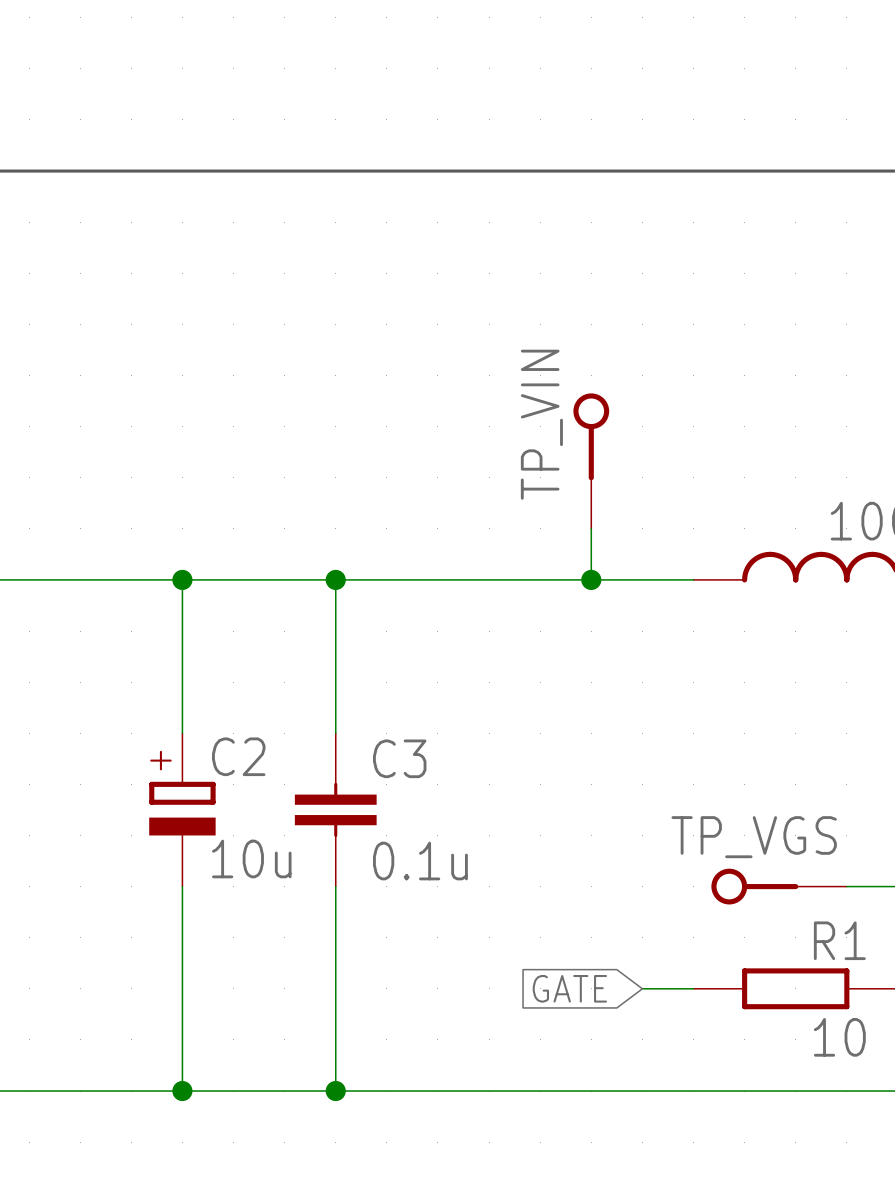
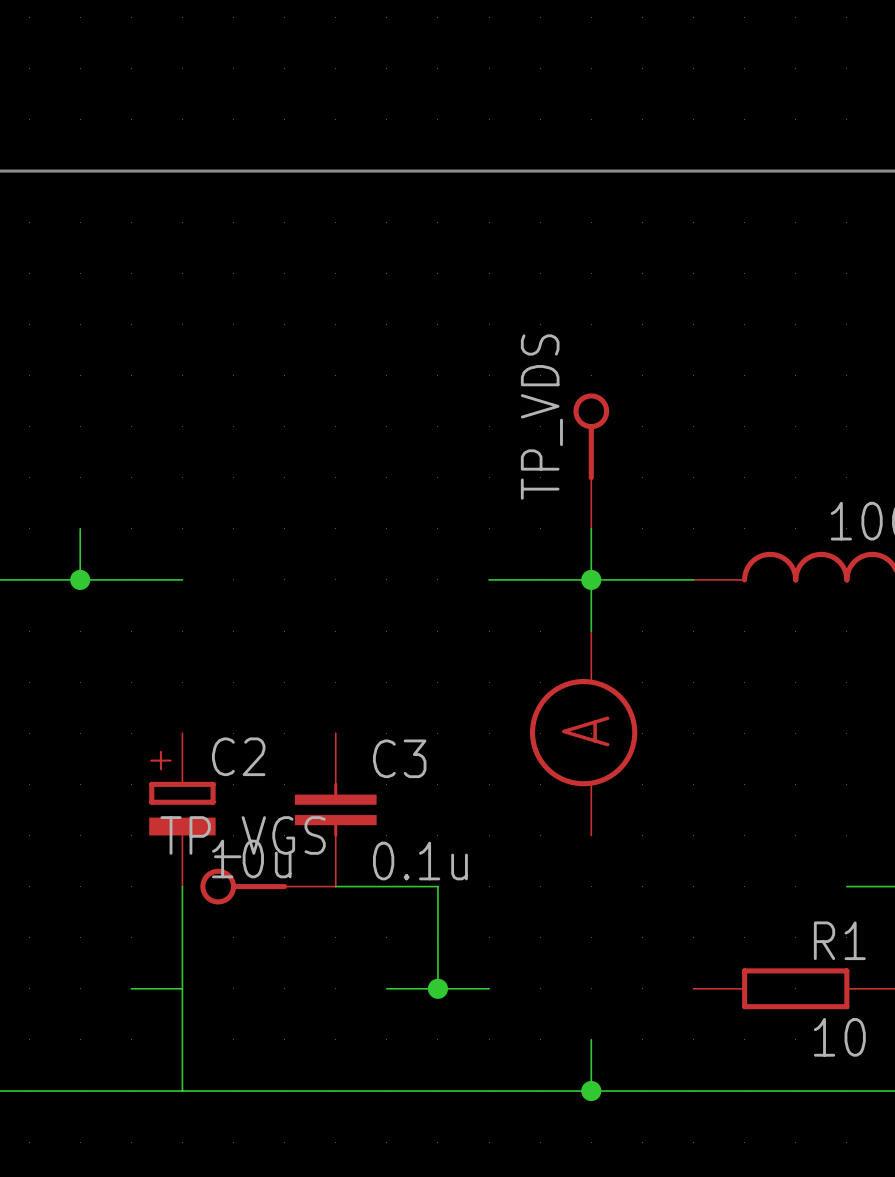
TP_VIN name: TP_VIN (541, 424) -> TP_VDS (541, 417)
wire: none -> (80, 528) (80, 579)
junction position: (182, 579) -> (80, 579)
wire: (335, 579) (335, 733) -> none
junction: (335, 579) -> none
wire: (489, 579) (182, 579) (182, 733) -> none
wire: none -> (591, 579) (591, 631)
part: none -> (583, 733)
TP_VGS: none -> (268, 886)
wire: (335, 886) (335, 1091) -> (335, 886) (437, 886) (437, 988)
TP_VGS: (779, 886) -> none
wire: none -> (131, 988) (182, 988)
wire: none -> (386, 988) (489, 988)
junction: none -> (437, 988)
global label: GATE (569, 988) -> none
wire: (642, 988) (693, 988) -> none
wire: none -> (591, 1039) (591, 1091)
junction: (182, 1091) -> none
junction: (335, 1091) -> none
junction: none -> (591, 1091)

